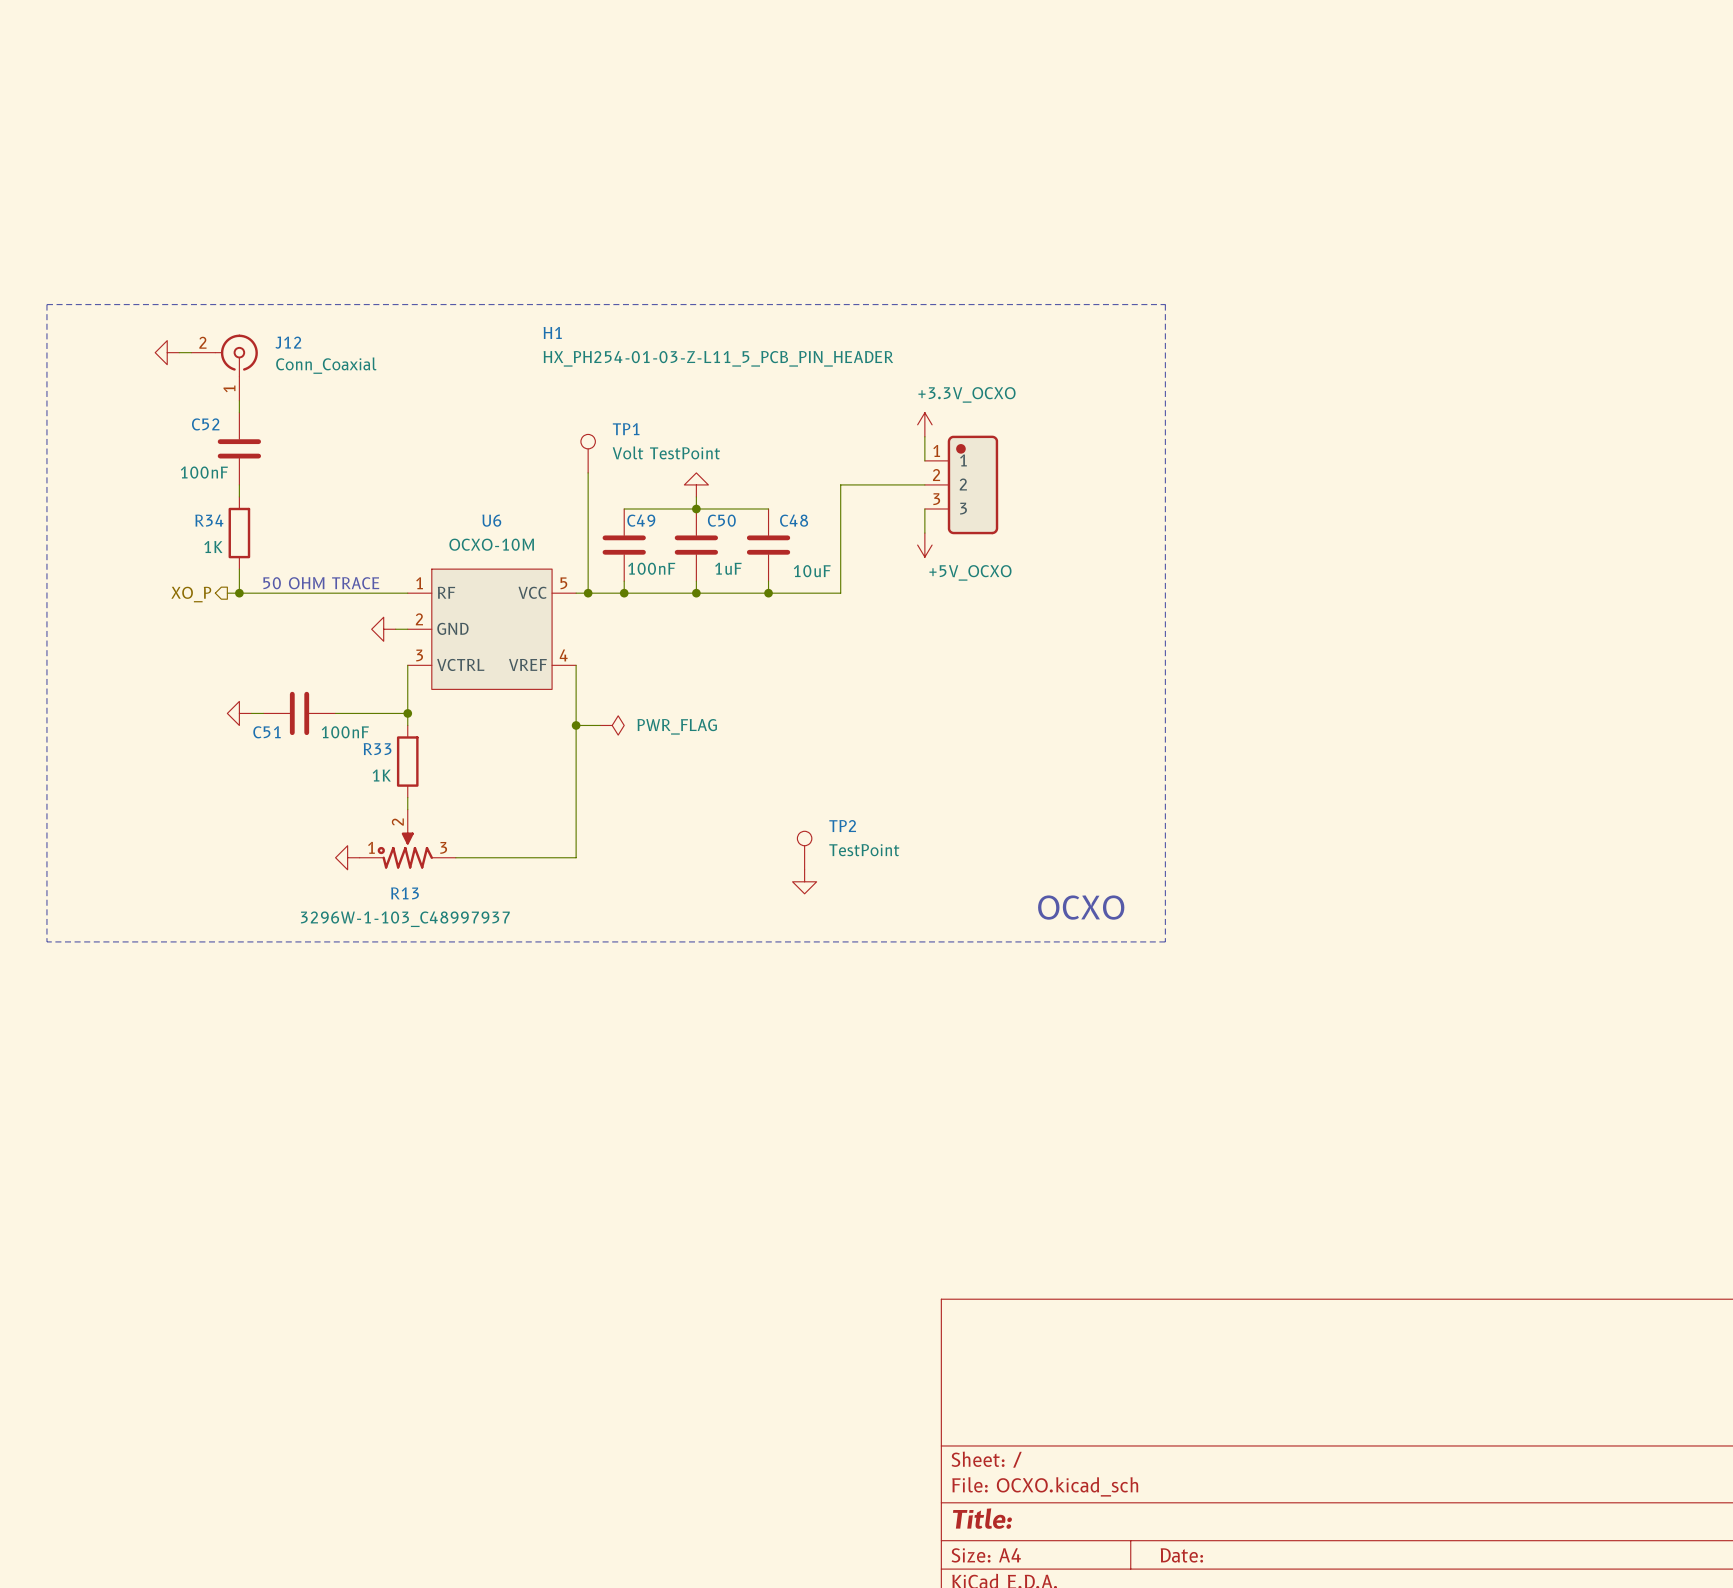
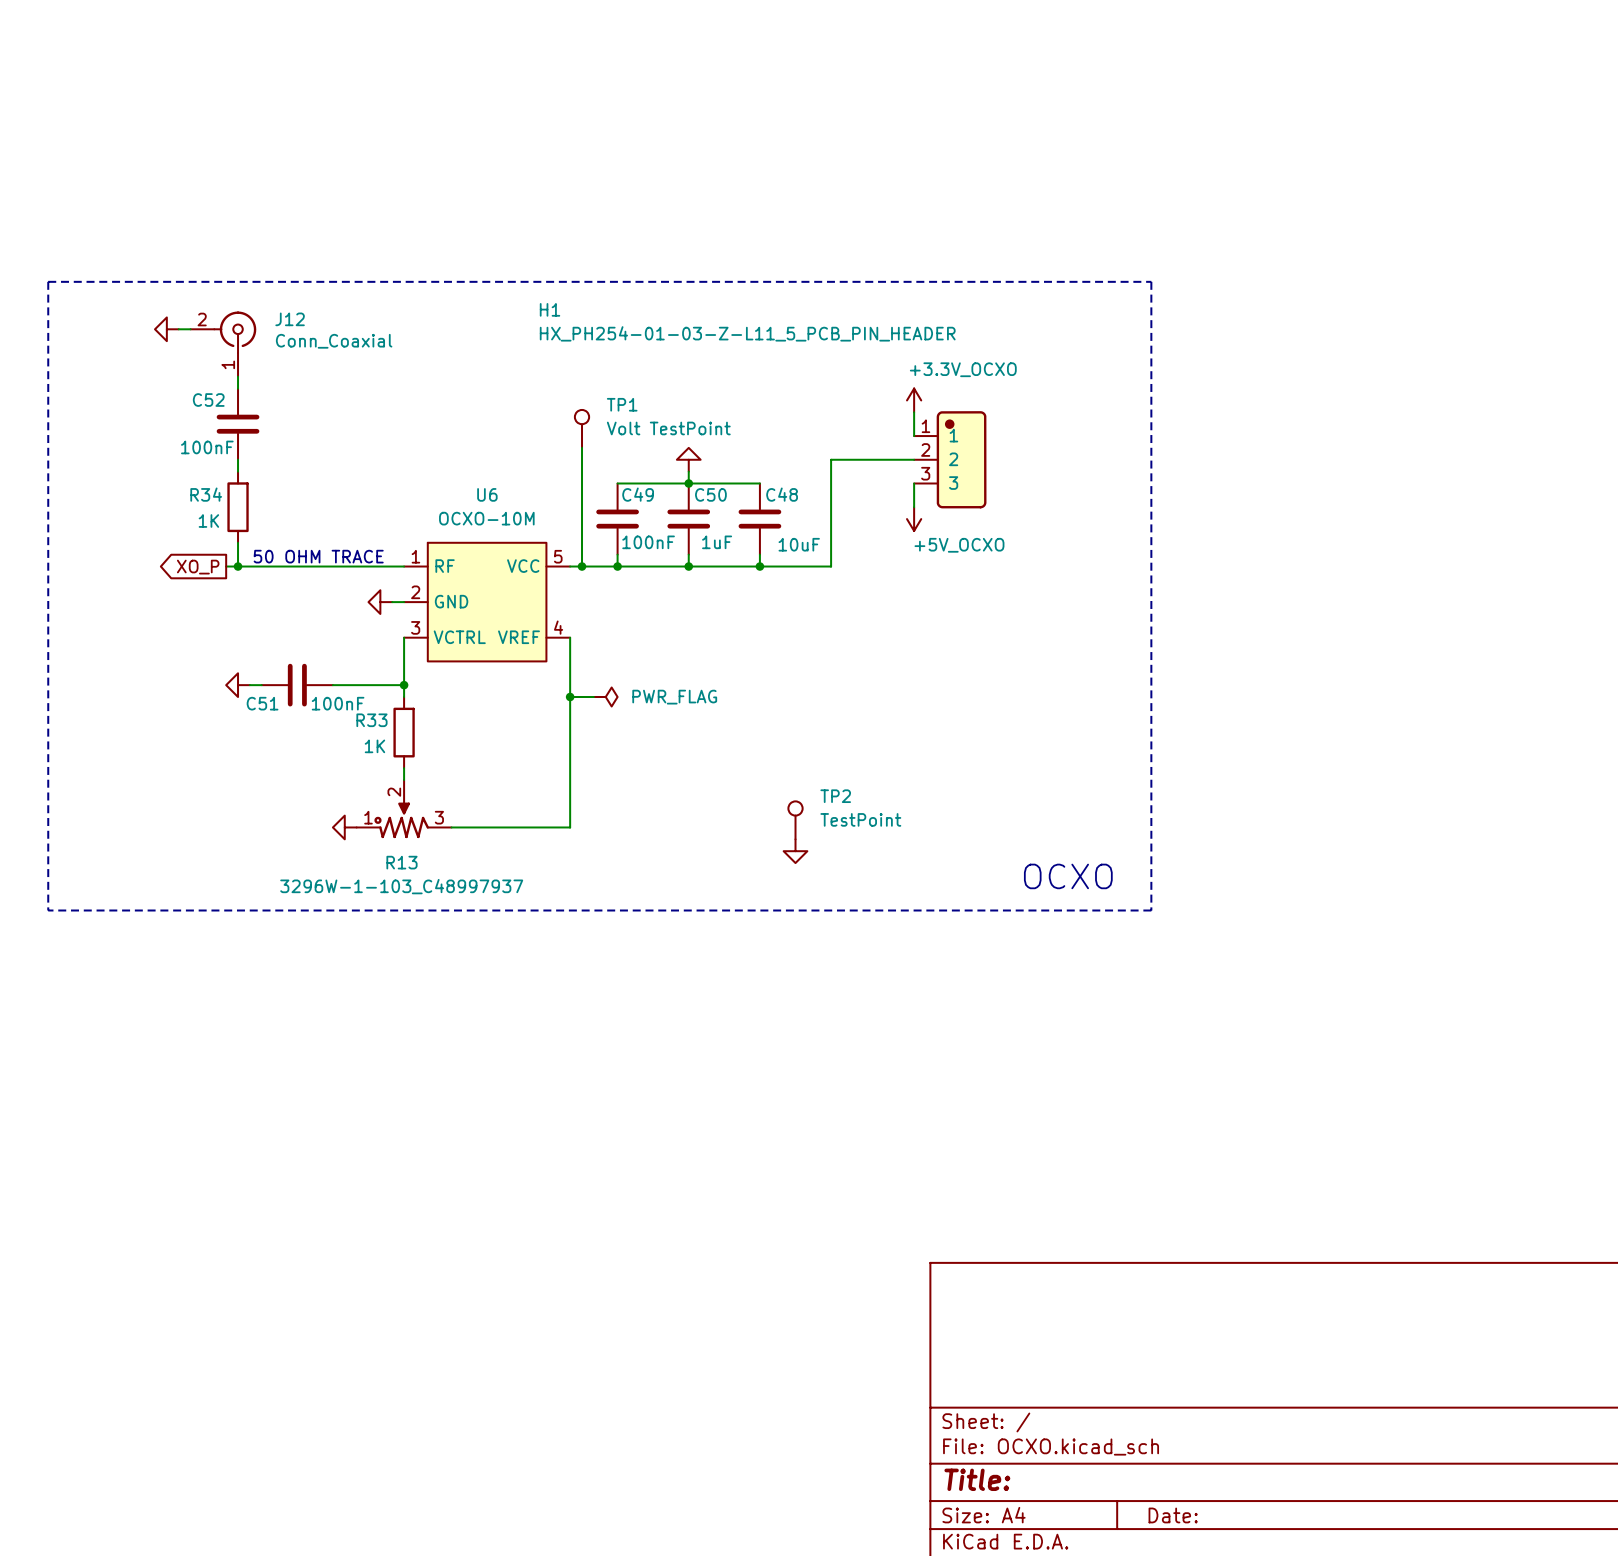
hierarchical label: XO_P (191, 594) -> none
global label: none -> XO_P (198, 567)

